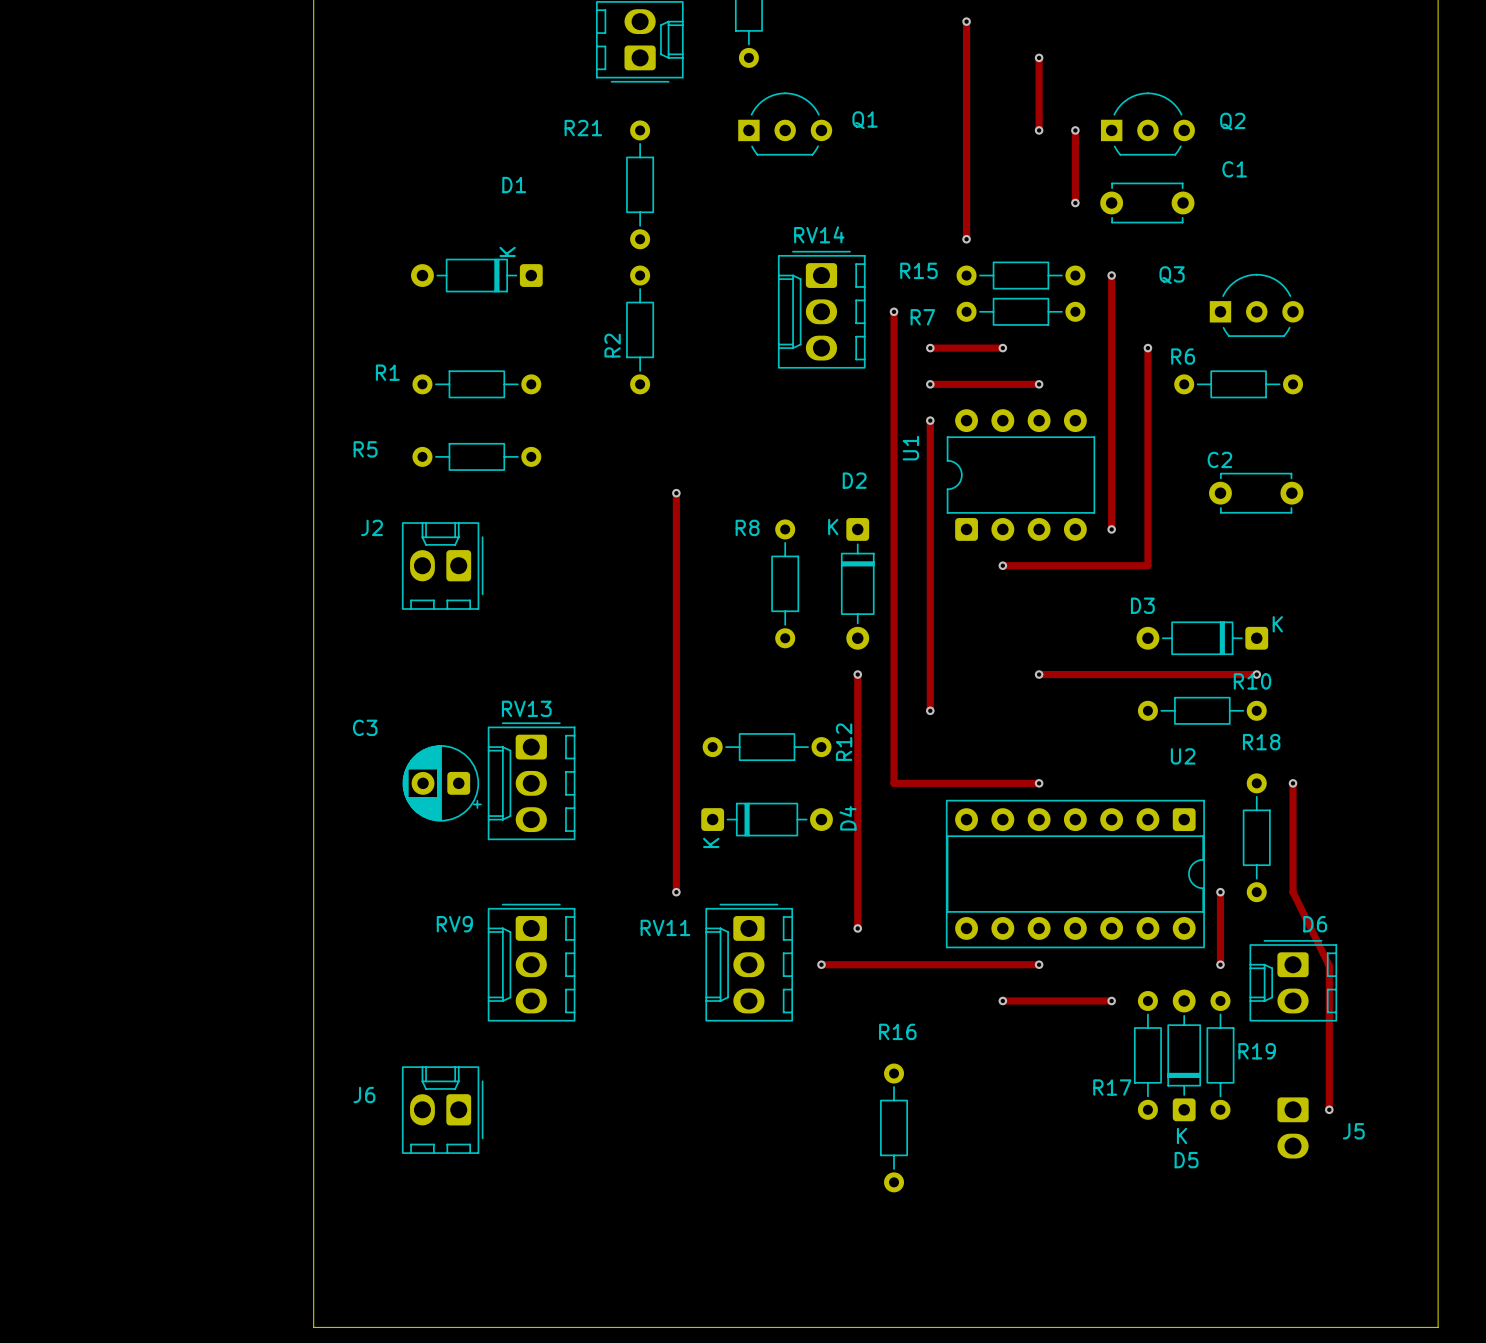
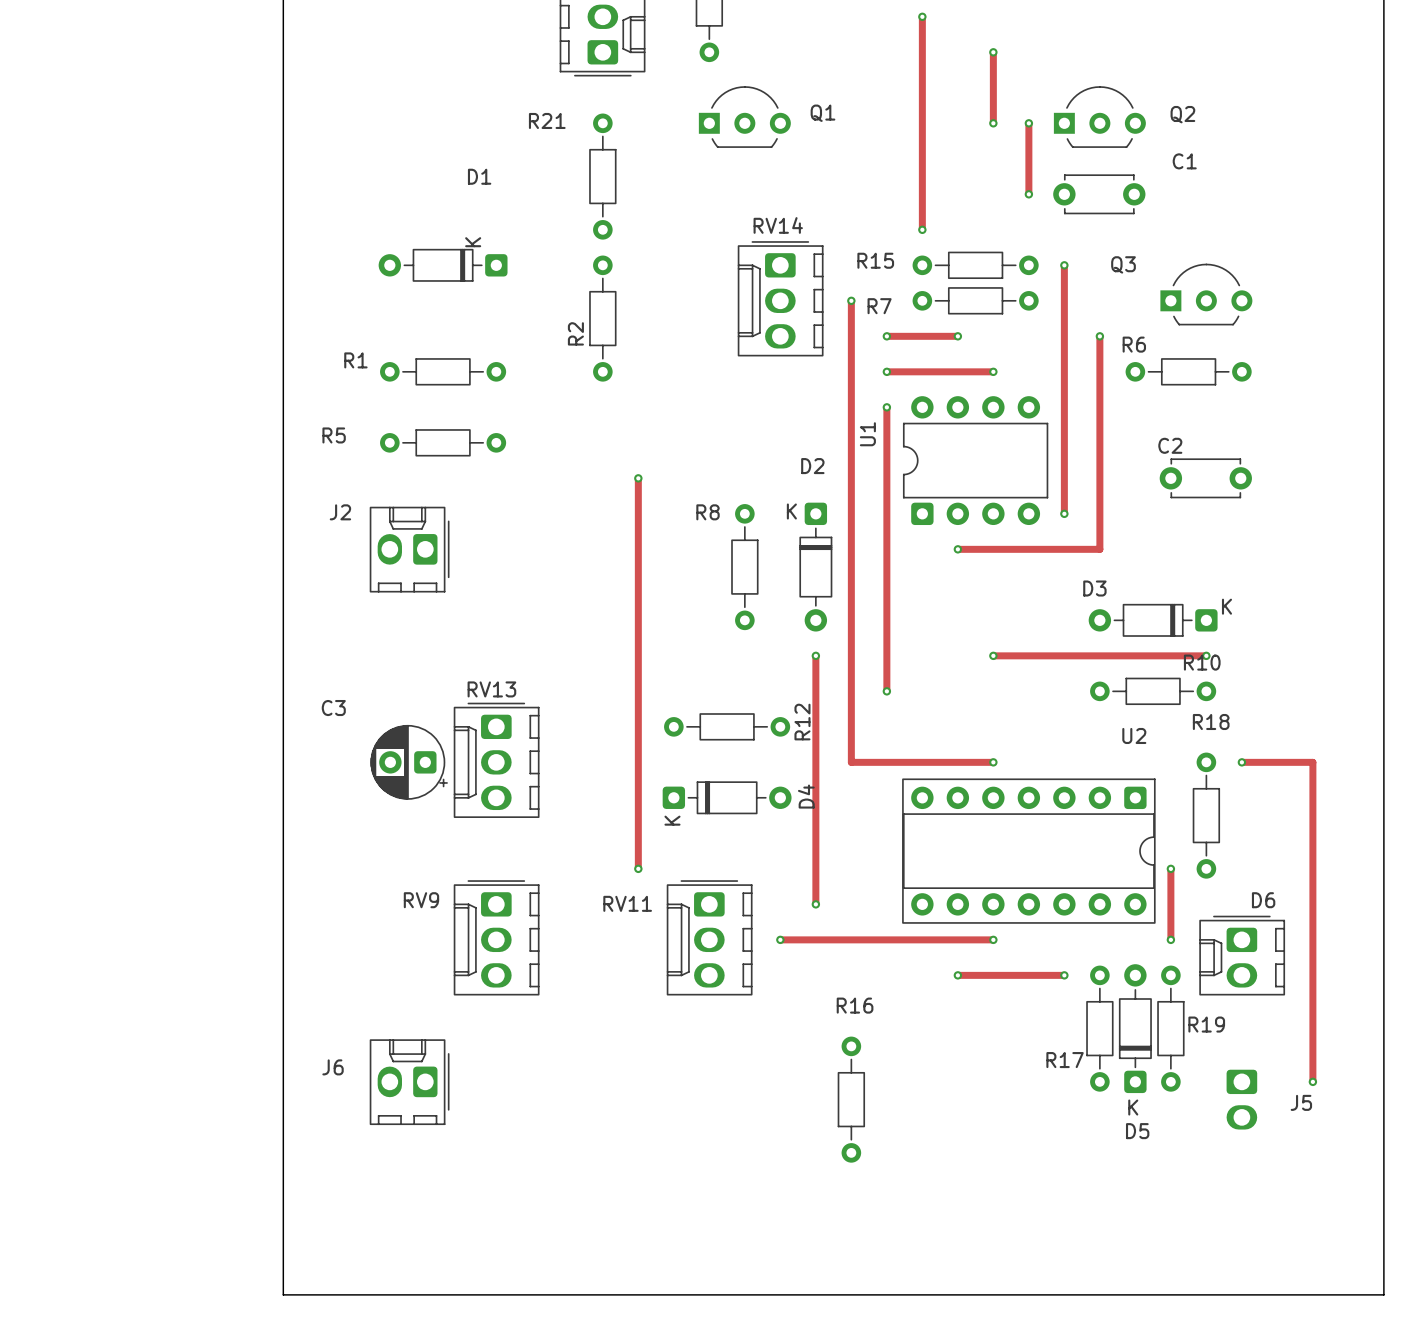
track: (1293, 783) (1293, 892) (1329, 965) (1329, 1109) -> (1241, 762) (1312, 762) (1312, 1081)
via position: (1329, 1109) -> (1312, 1081)

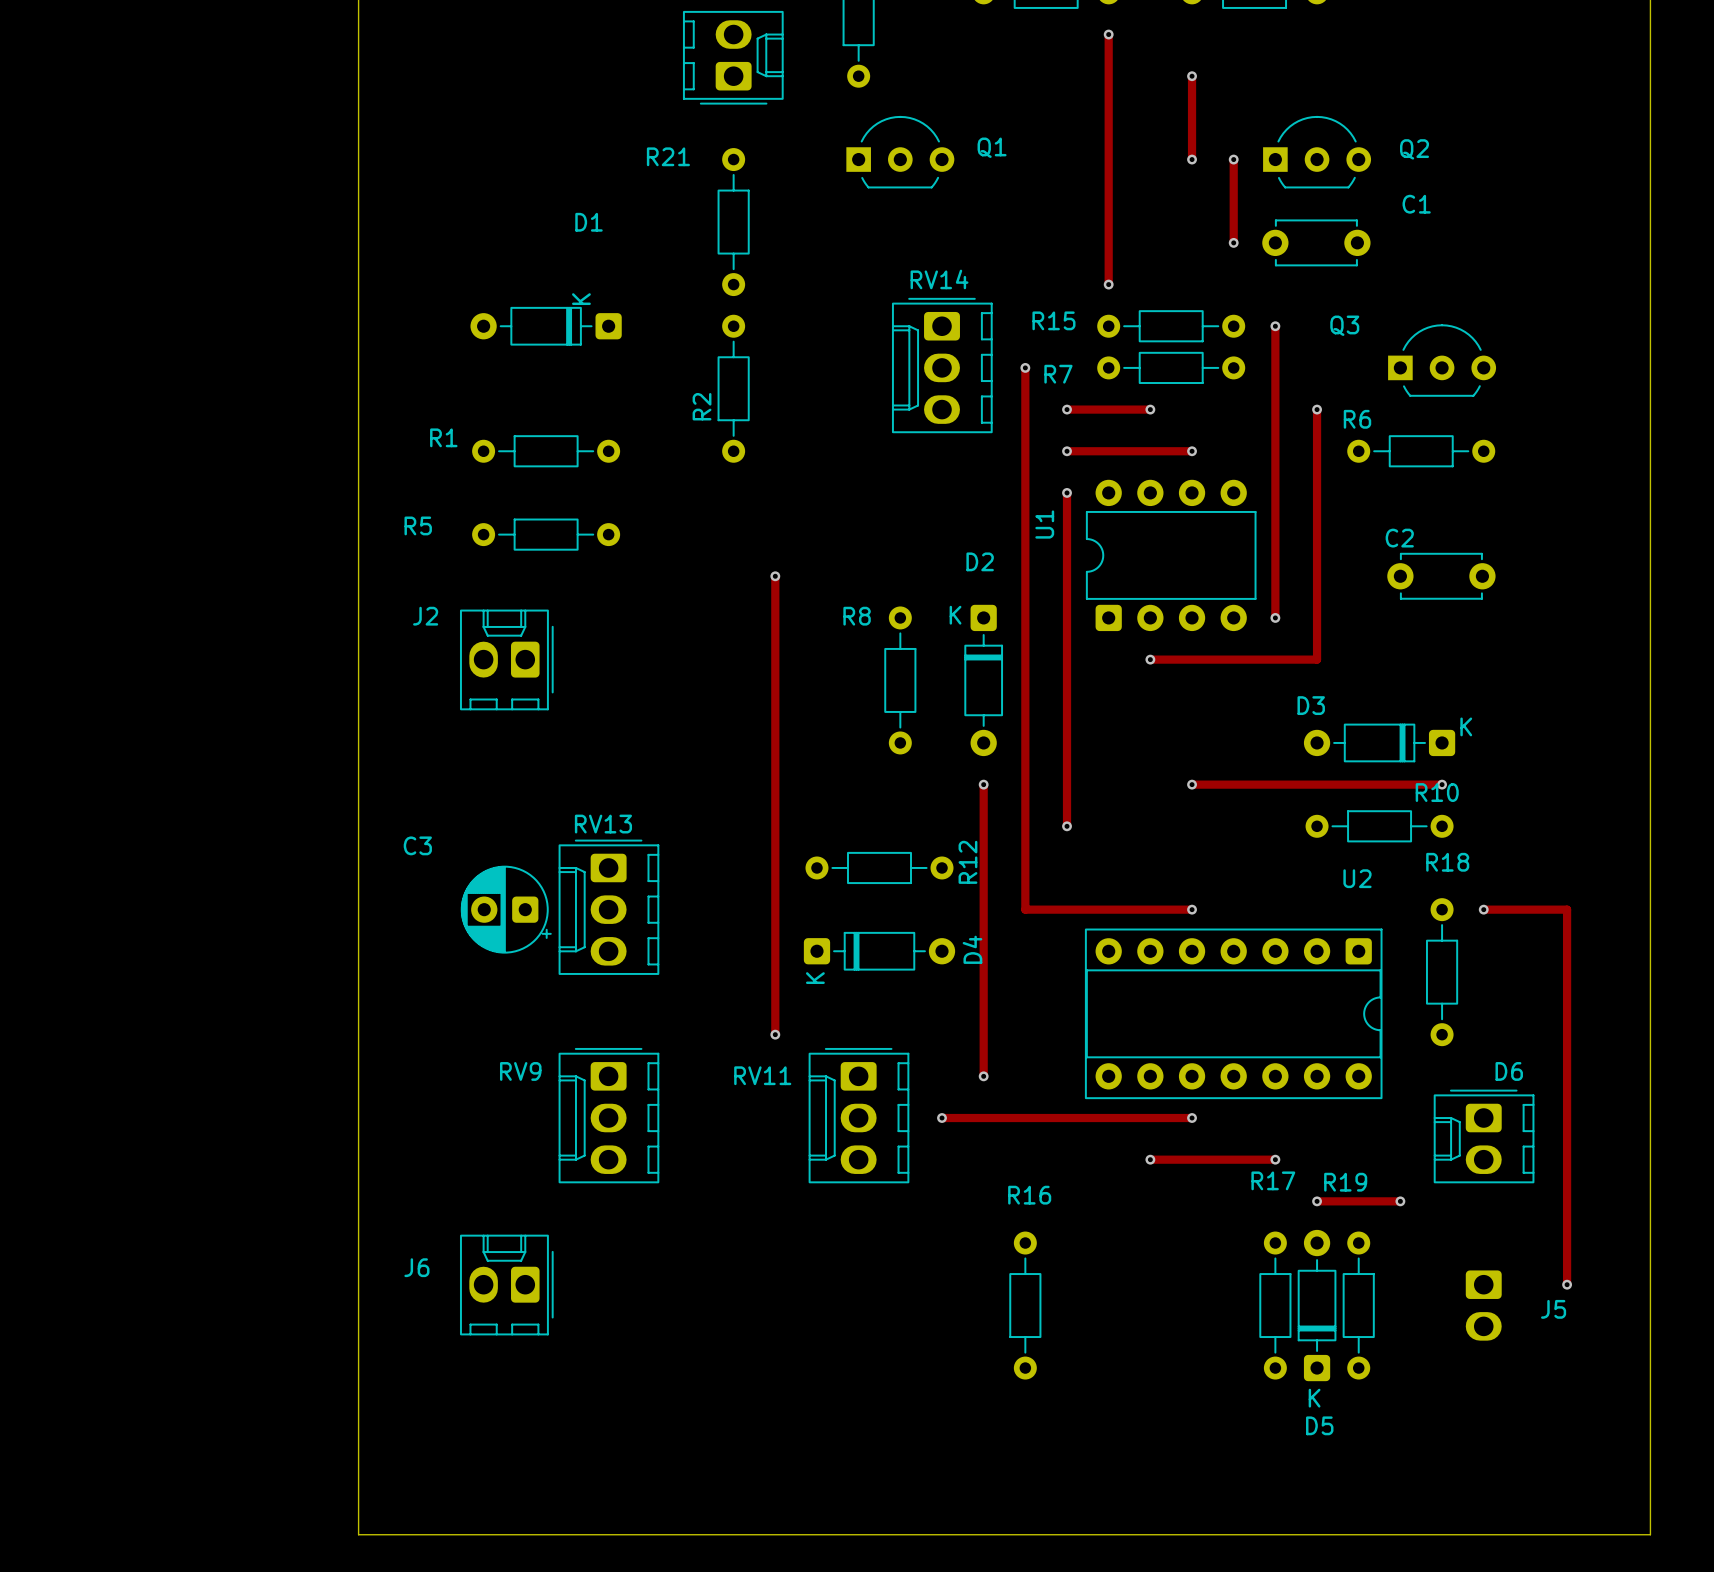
track: (1170, 868) (1170, 939) -> none
via: (1170, 868) -> none
via: (1170, 939) -> none
track: none -> (1317, 1201) (1400, 1201)
via: none -> (1317, 1201)
via: none -> (1400, 1201)
R19 name position: R19 (1206, 1024) -> R19 (1345, 1182)
R17 position: (1099, 1028) -> (1275, 1305)
D5 position: (1135, 1028) -> (1317, 1305)
R19 position: (1170, 1028) -> (1358, 1305)
R17 name position: R17 (1065, 1060) -> R17 (1273, 1180)

